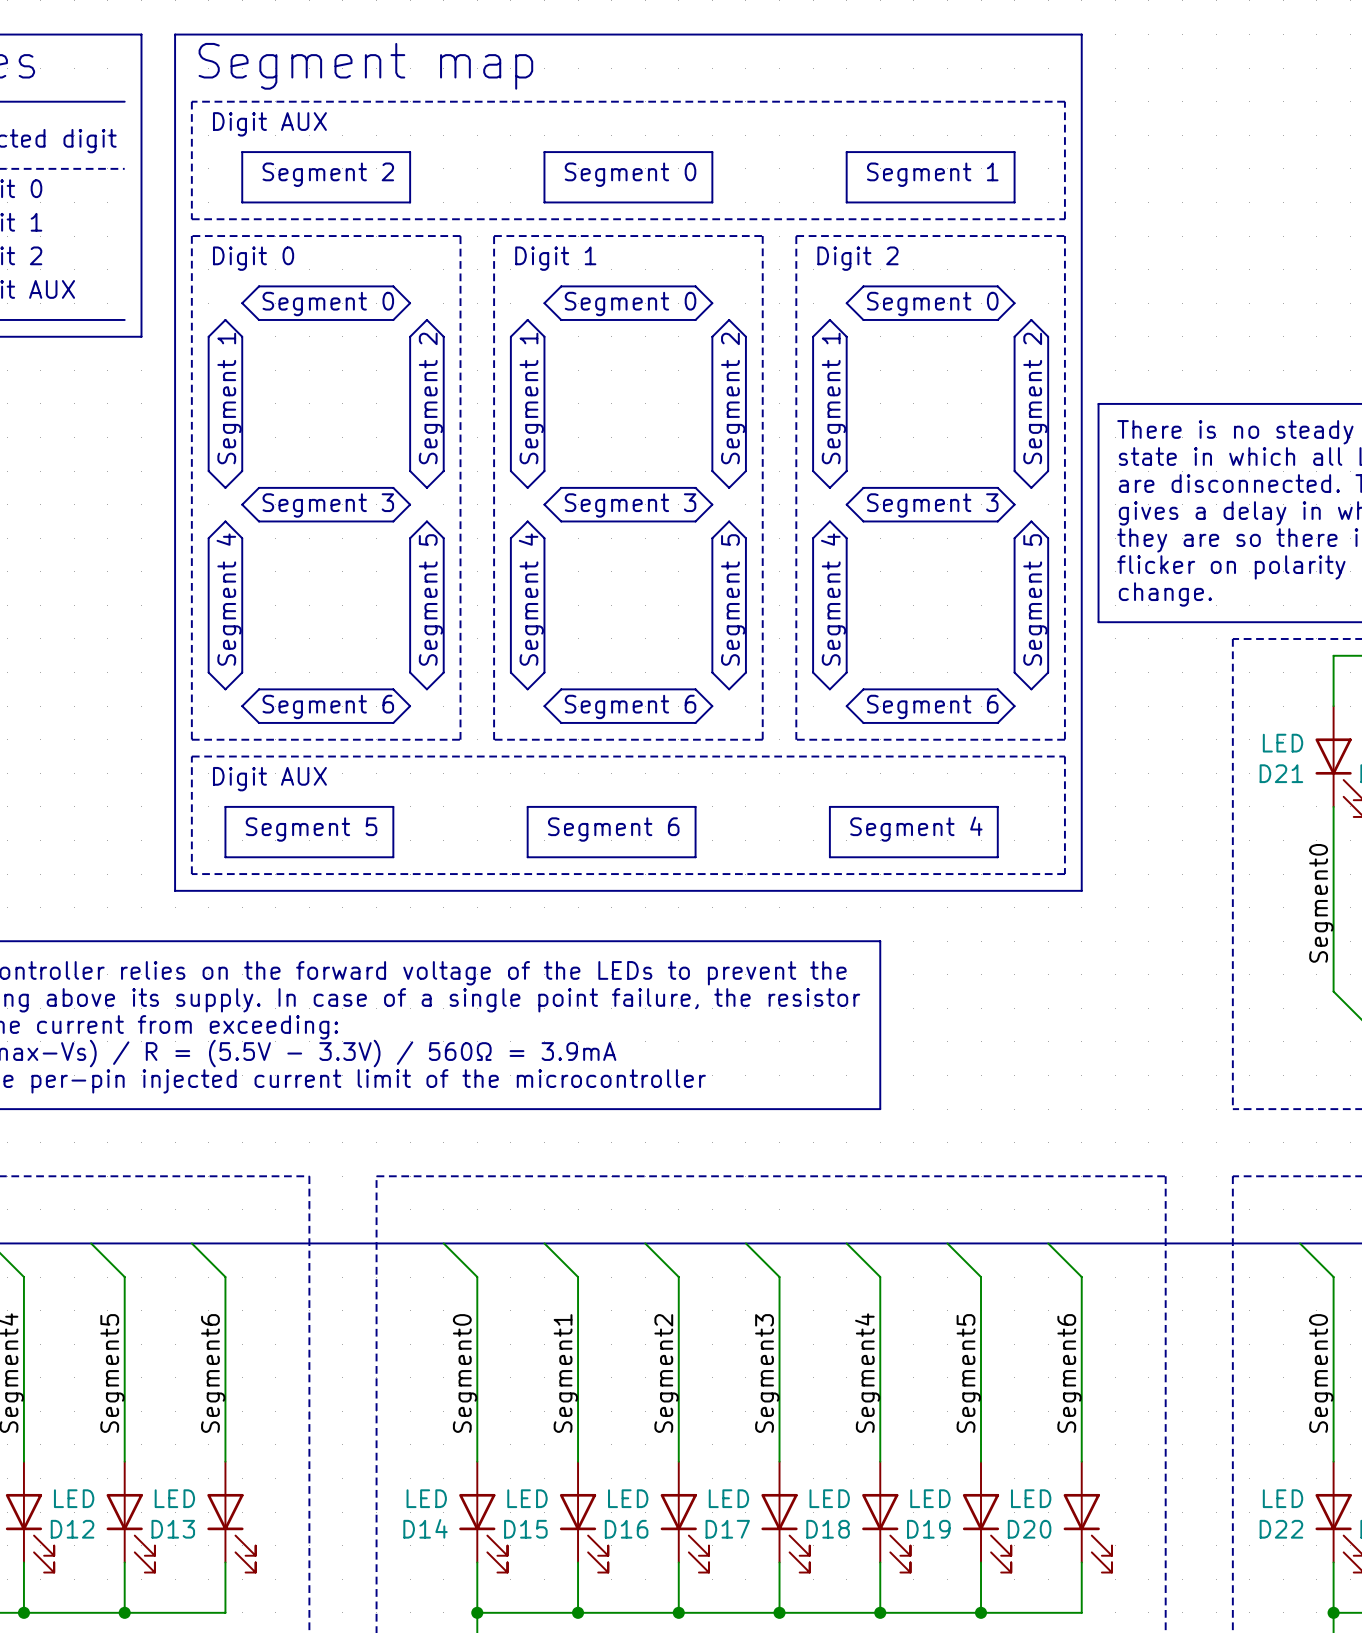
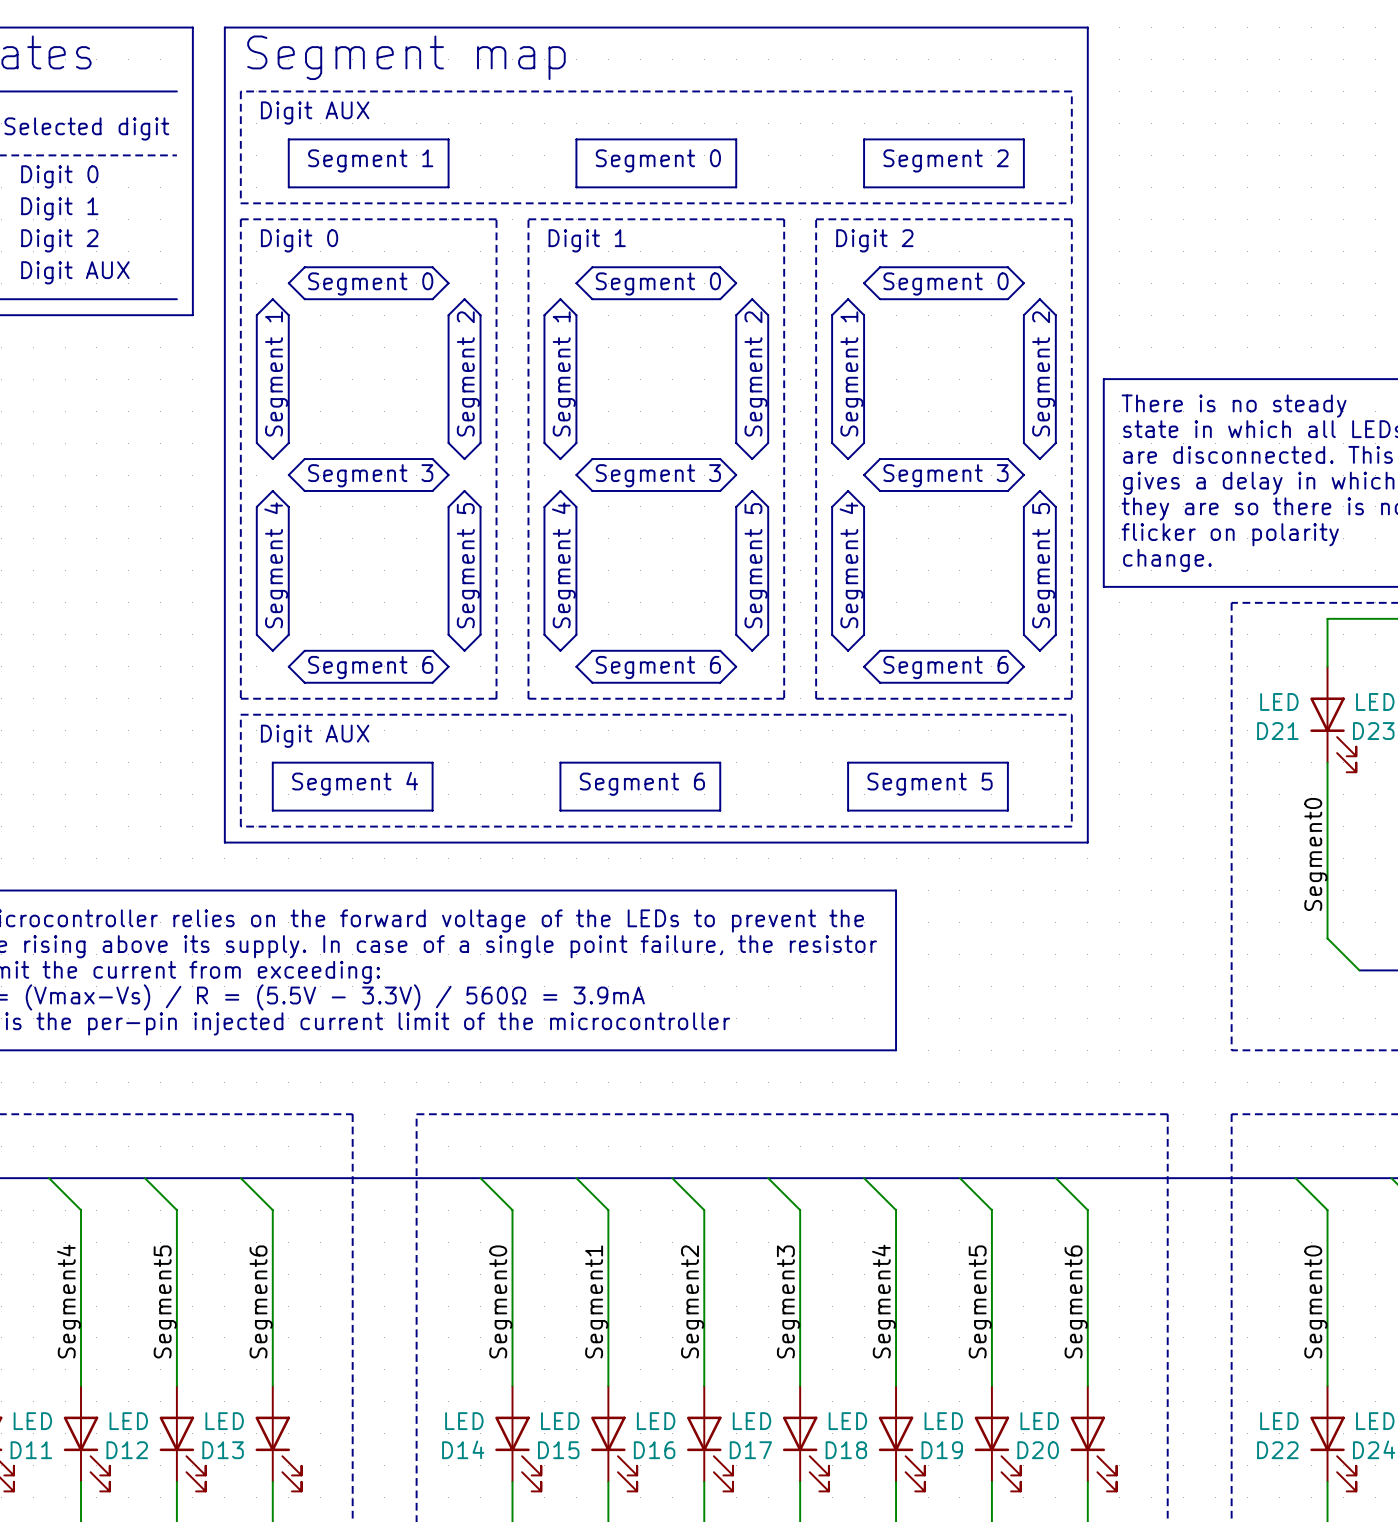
text: Segment 2 (328, 174) -> Segment 1 (370, 160)
text: Segment 1 (932, 174) -> Segment 2 (946, 160)
text: Segment 5 (311, 829) -> Segment 4 (355, 783)
text: Segment 4 (916, 829) -> Segment 5 (930, 784)

